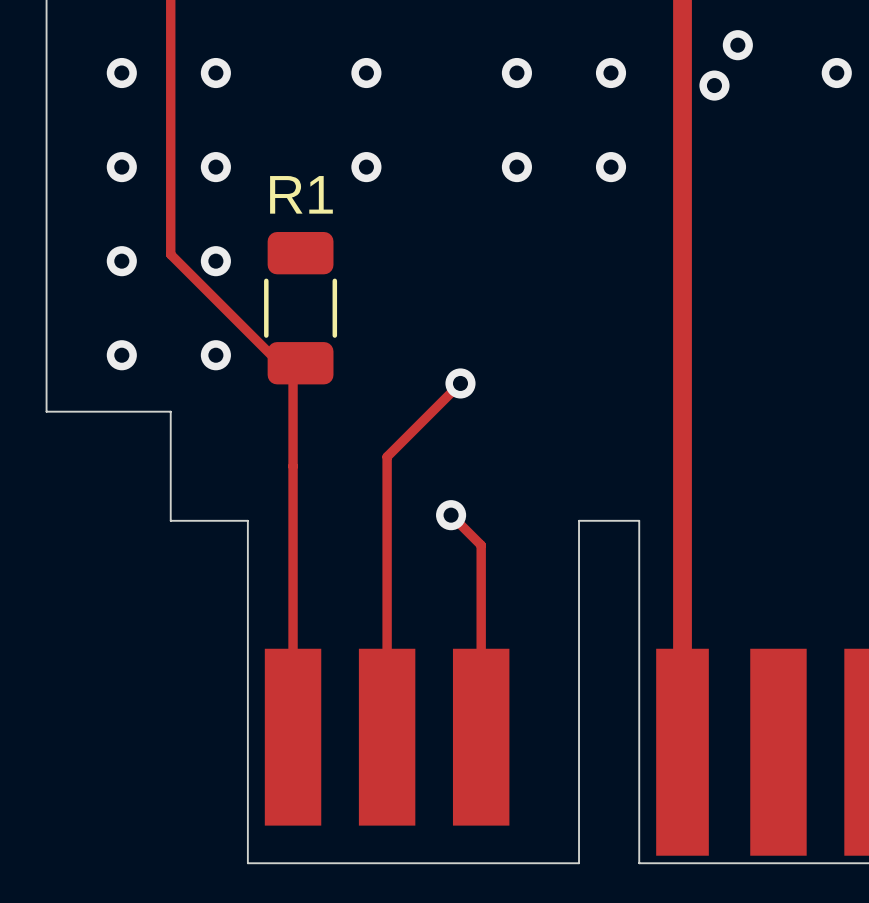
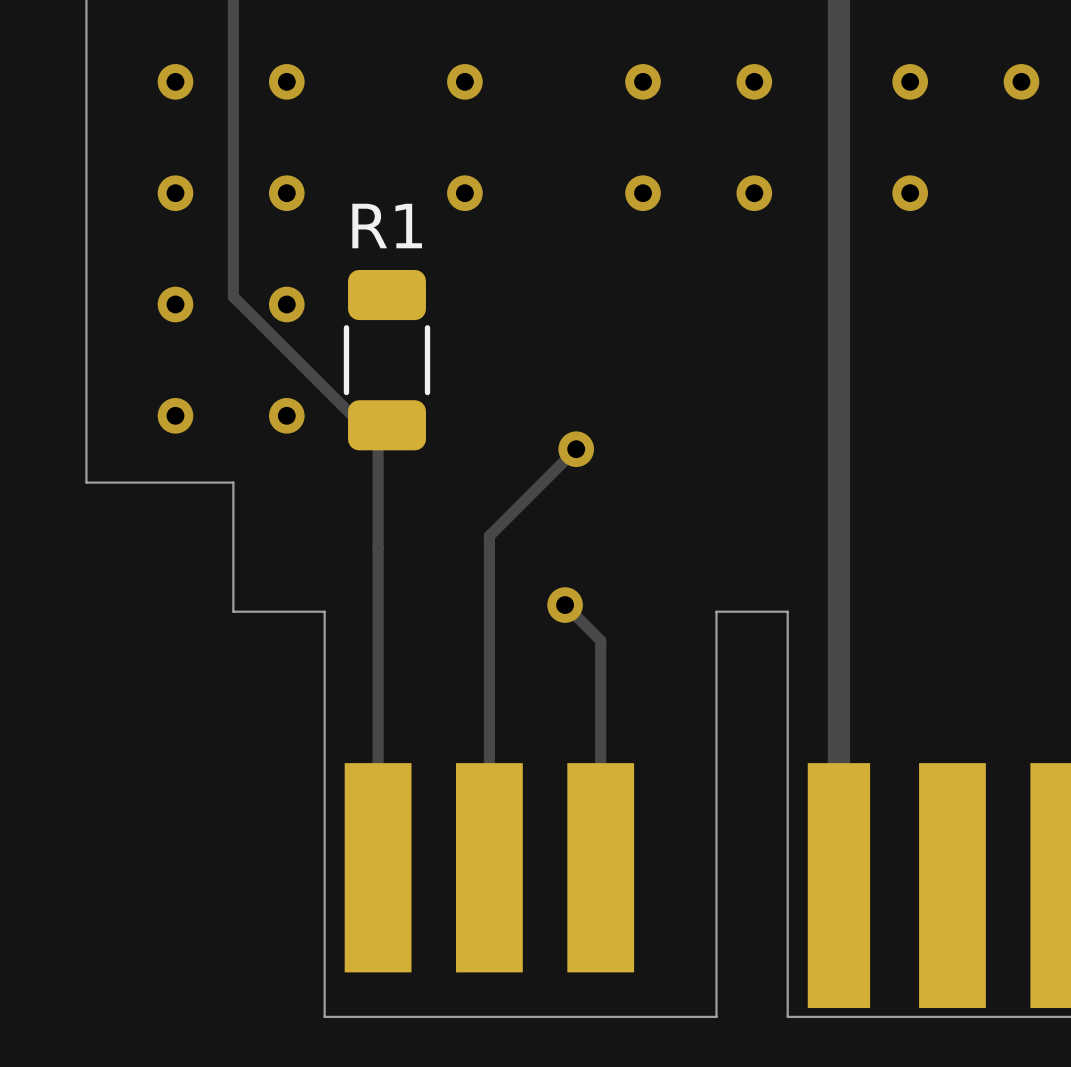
via: (737, 45) -> none
via: none -> (910, 81)
via: (714, 85) -> none
via: none -> (910, 193)

